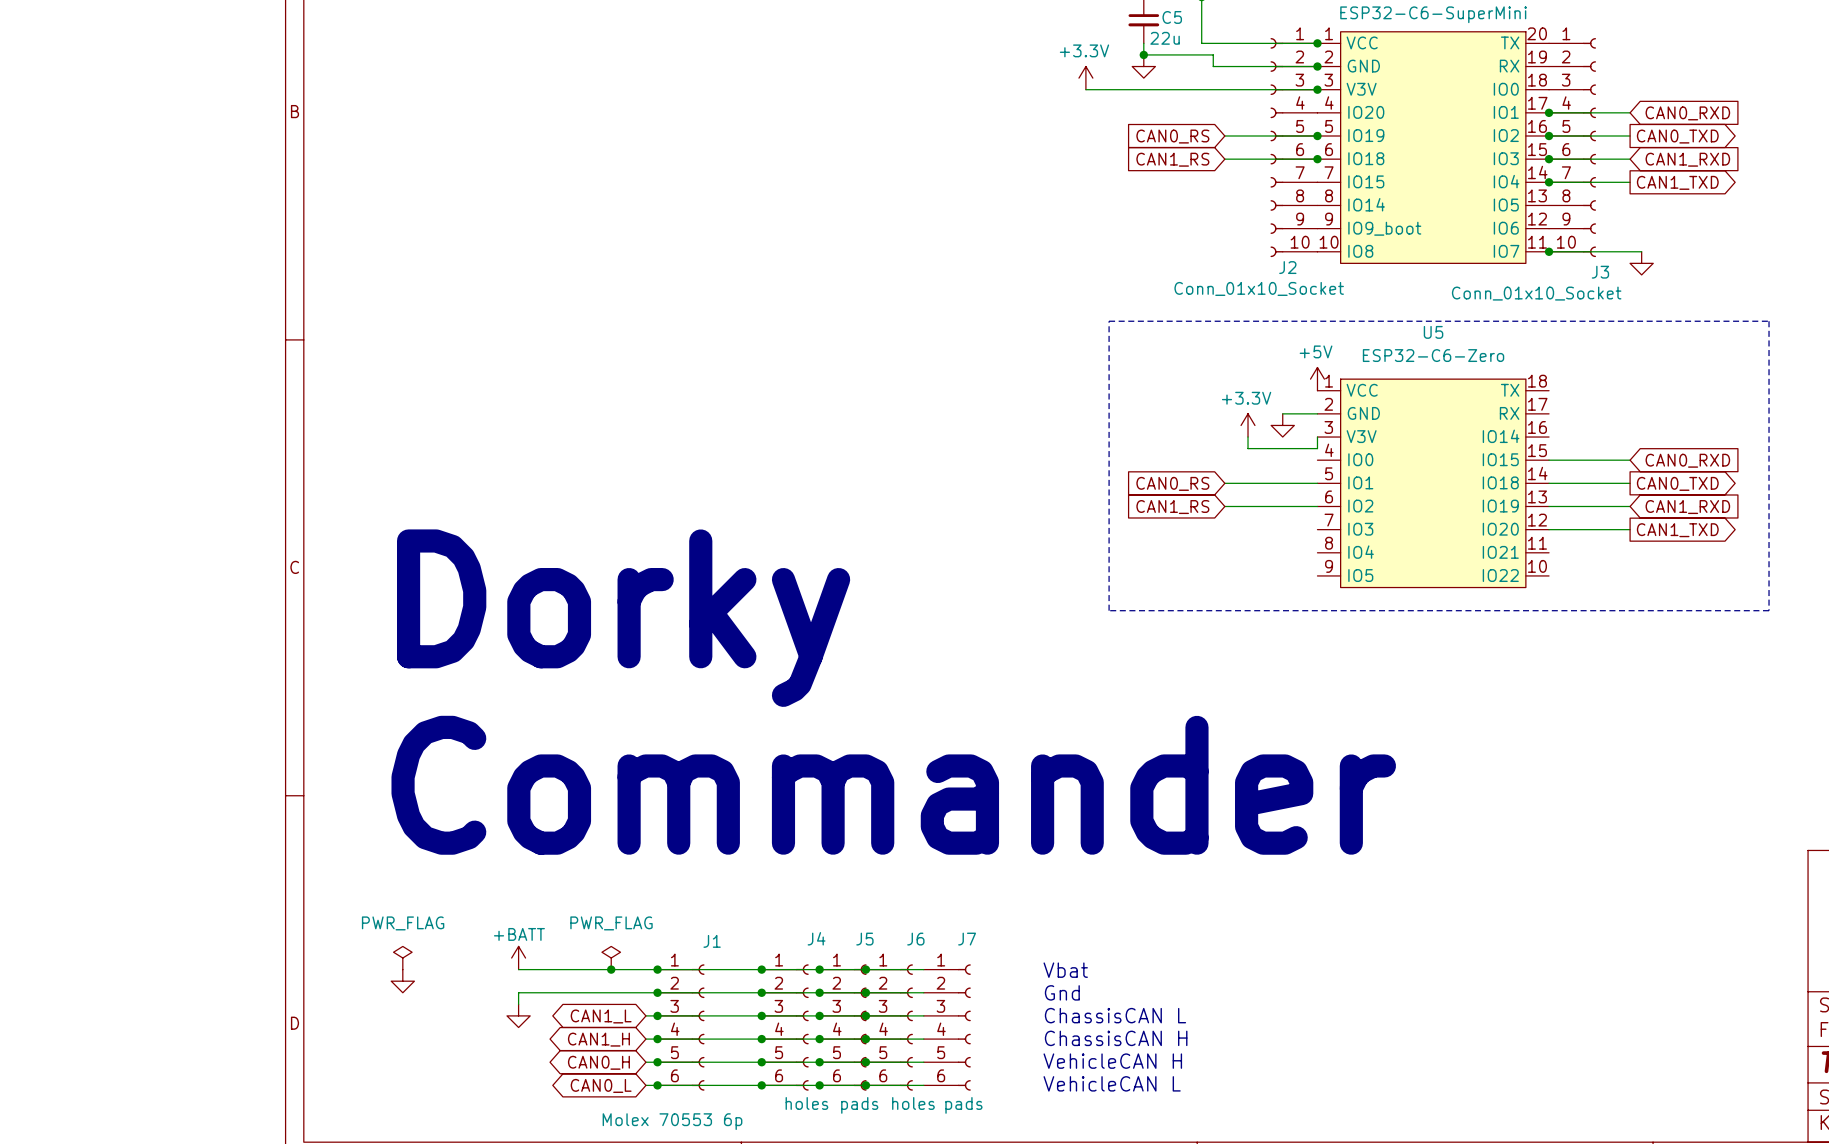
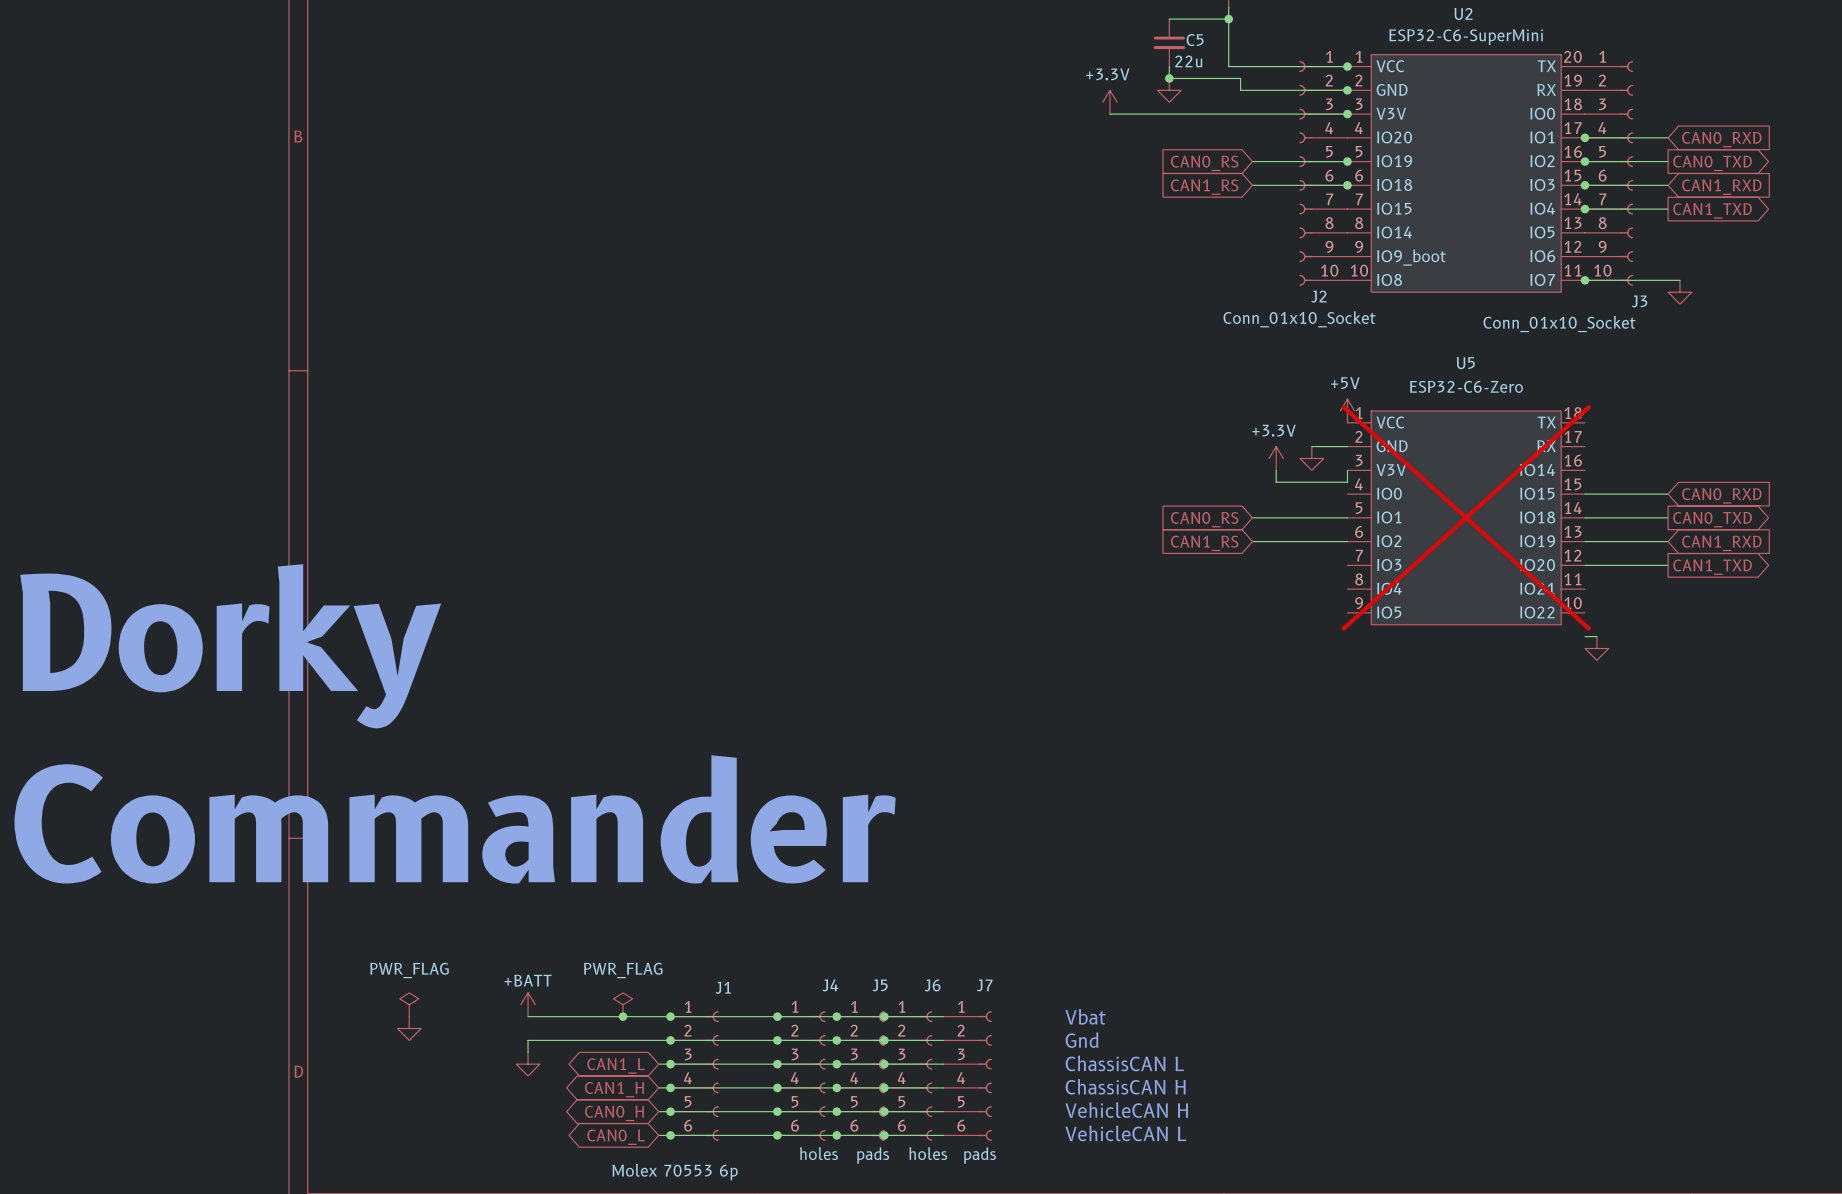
line: (1109, 321) (1769, 321) (1769, 610) (1109, 610) (1109, 321) -> none
U5 do-not-place cross: none -> (1466, 517)
wire: none -> (1584, 636) (1596, 636)
power symbol: none -> (1596, 648)
text: none -> Dorky (230, 646)
text: Dorky (623, 618) -> none
text: none -> Commander (455, 819)
text: Commander (893, 785) -> none

